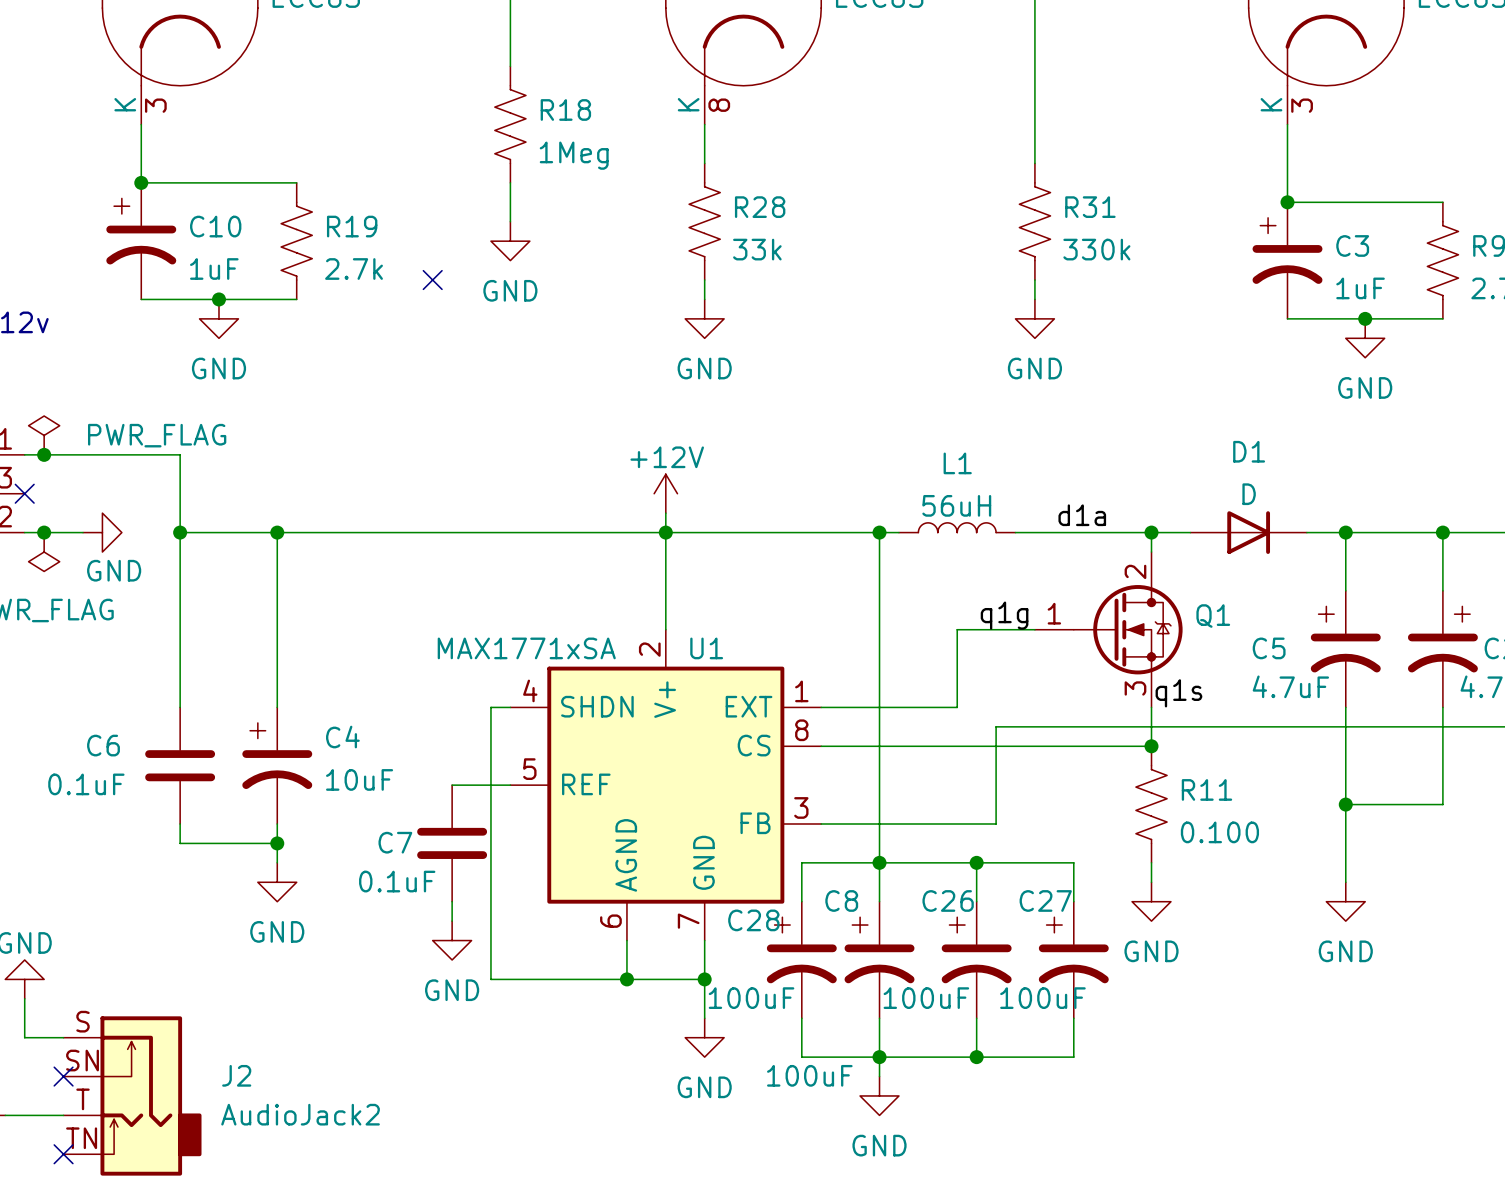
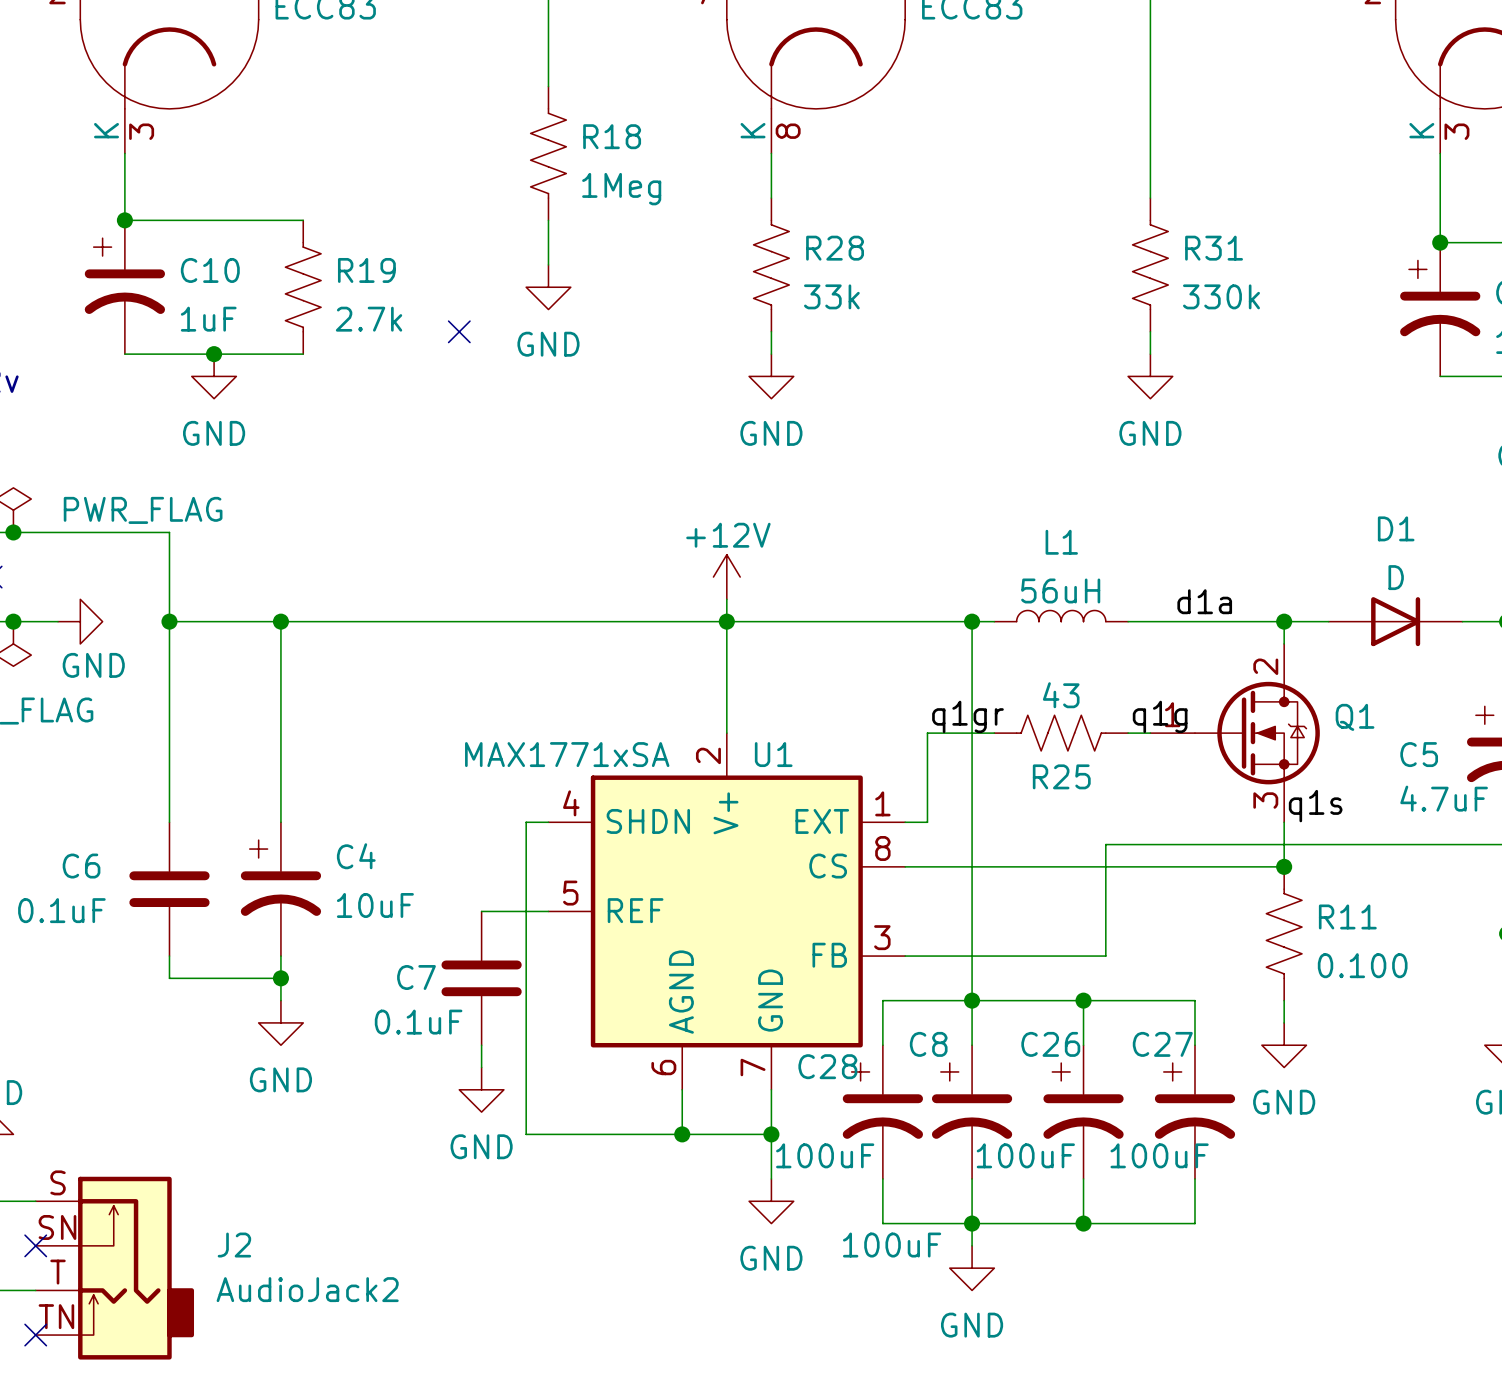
label: none -> q1gr (967, 716)
label position: q1g (1004, 615) -> q1g (1160, 716)
R25: none -> 43 (1061, 733)
wire: (1015, 629) (957, 629) (957, 707) (840, 707) -> (994, 733) (927, 733) (927, 822)

